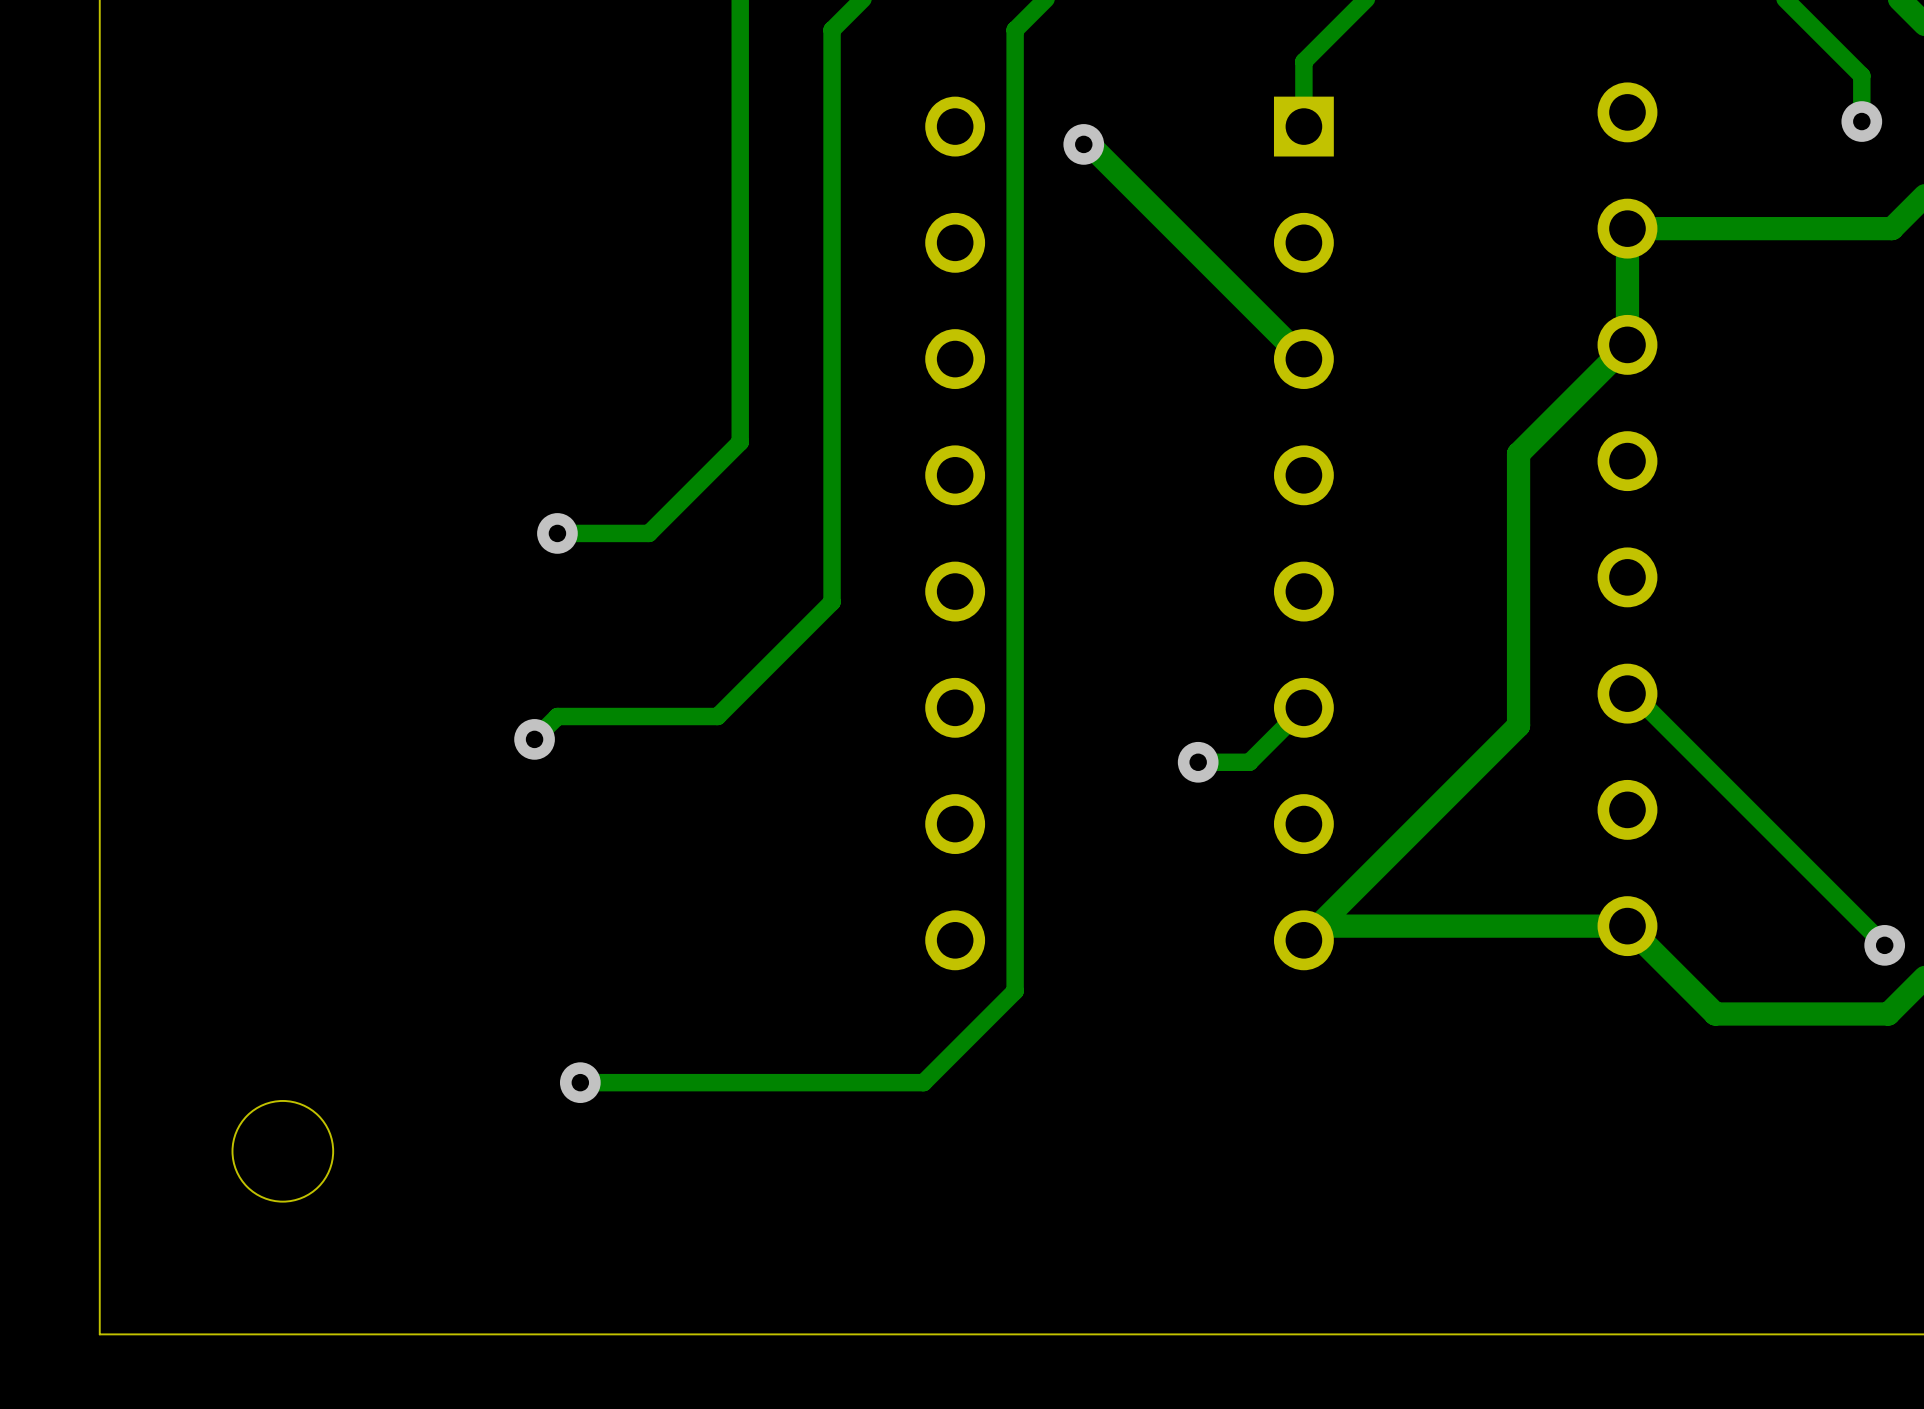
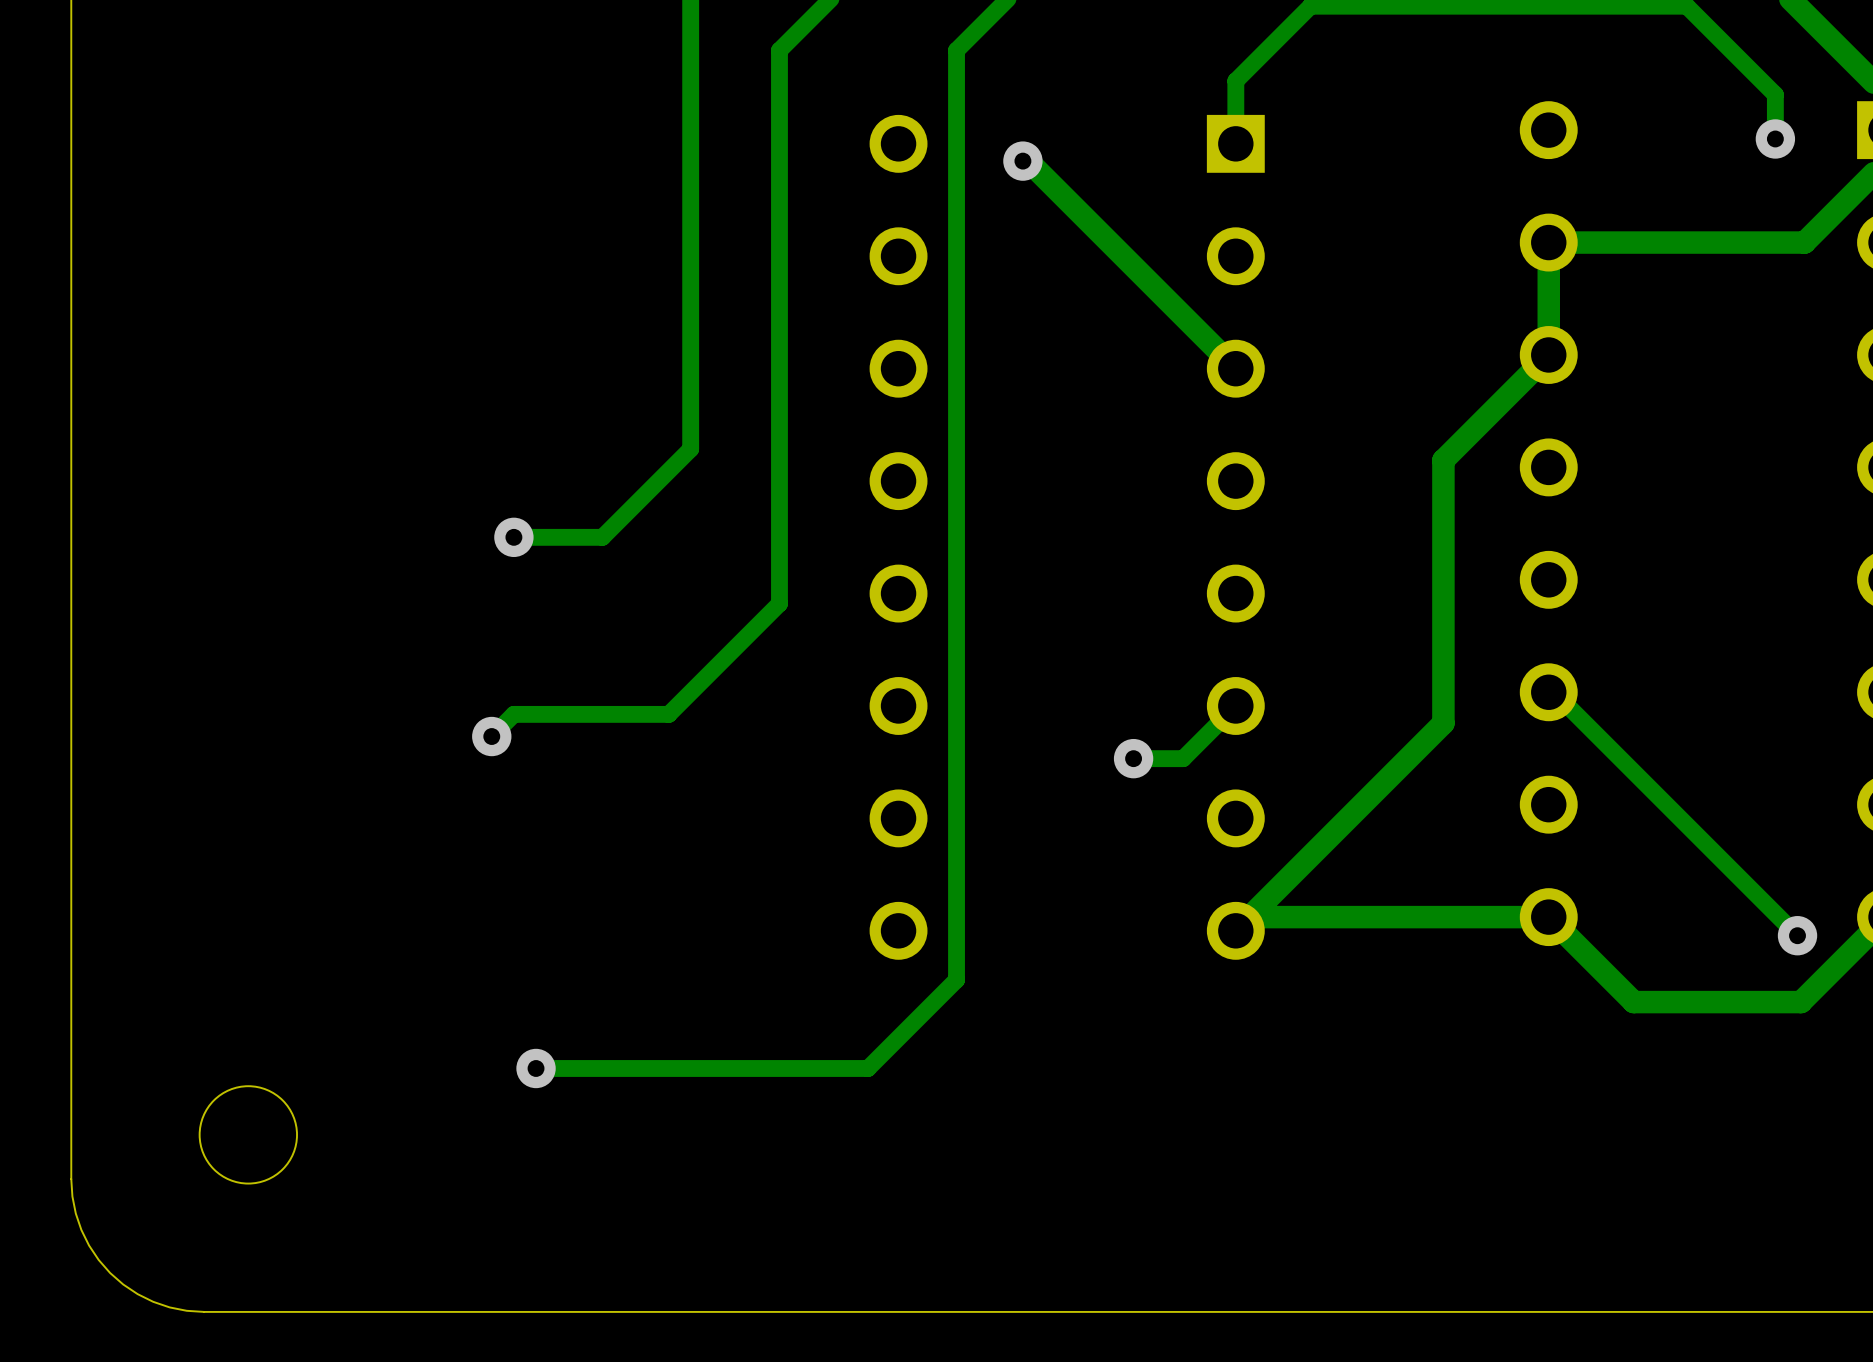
board edge: (99, 1197) (99, 1334) (237, 1334) -> (71, 1179) (75, 1213) (81, 1229) (89, 1245) (110, 1273) (137, 1294) (153, 1301) (186, 1310) (204, 1311)

